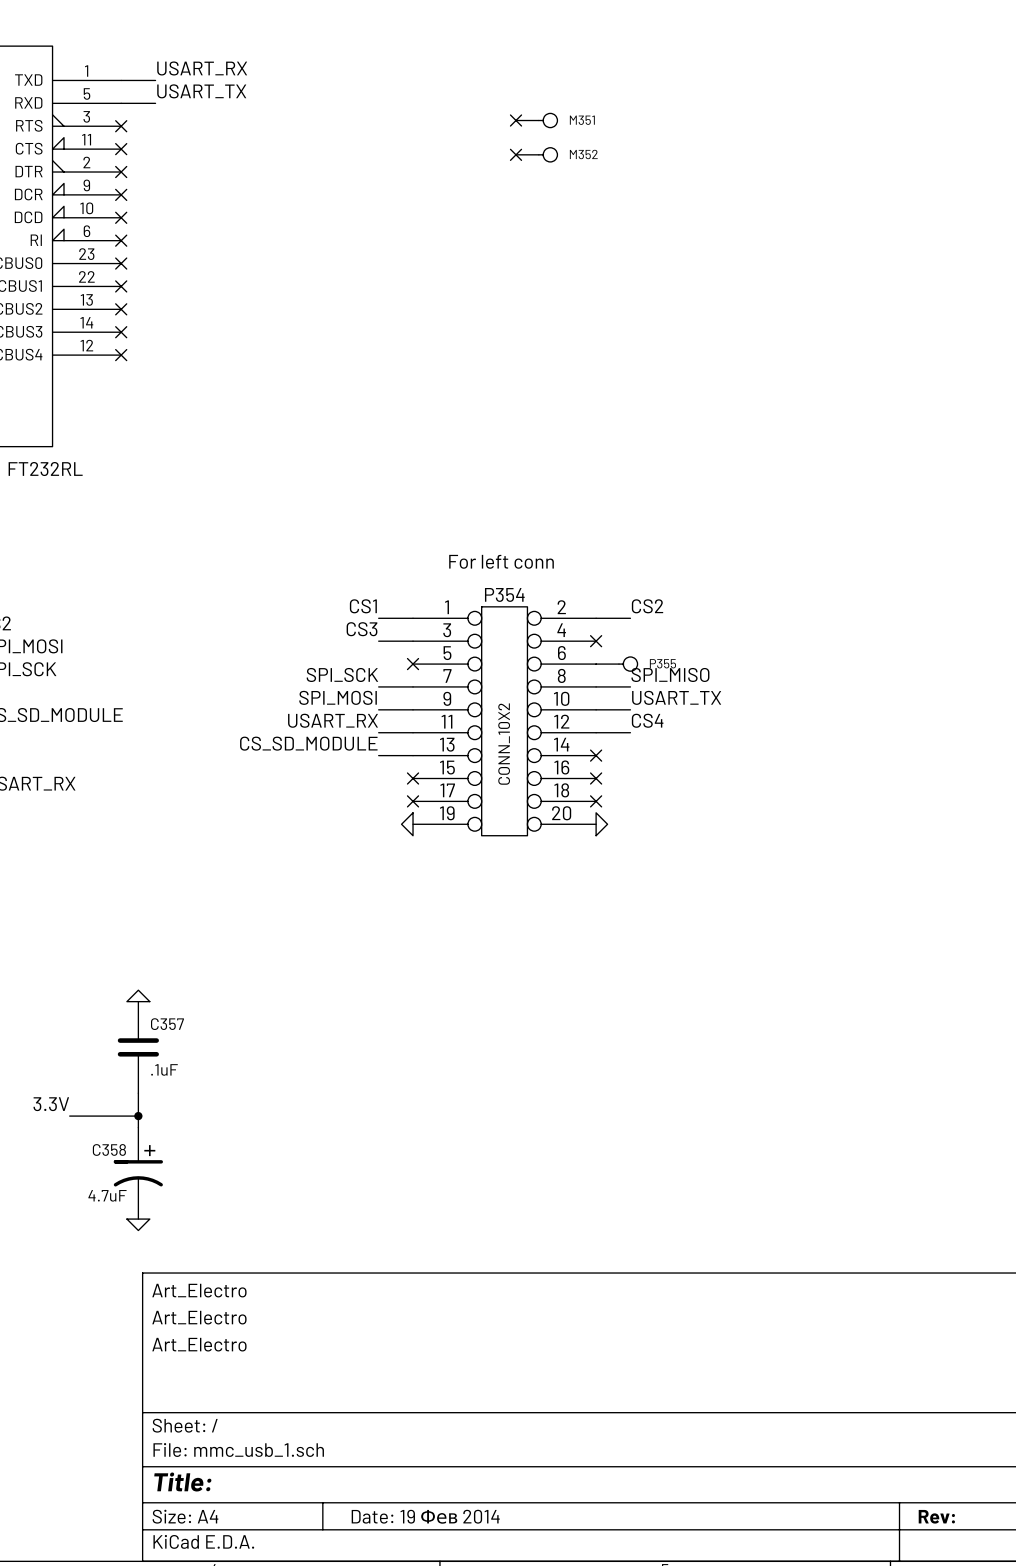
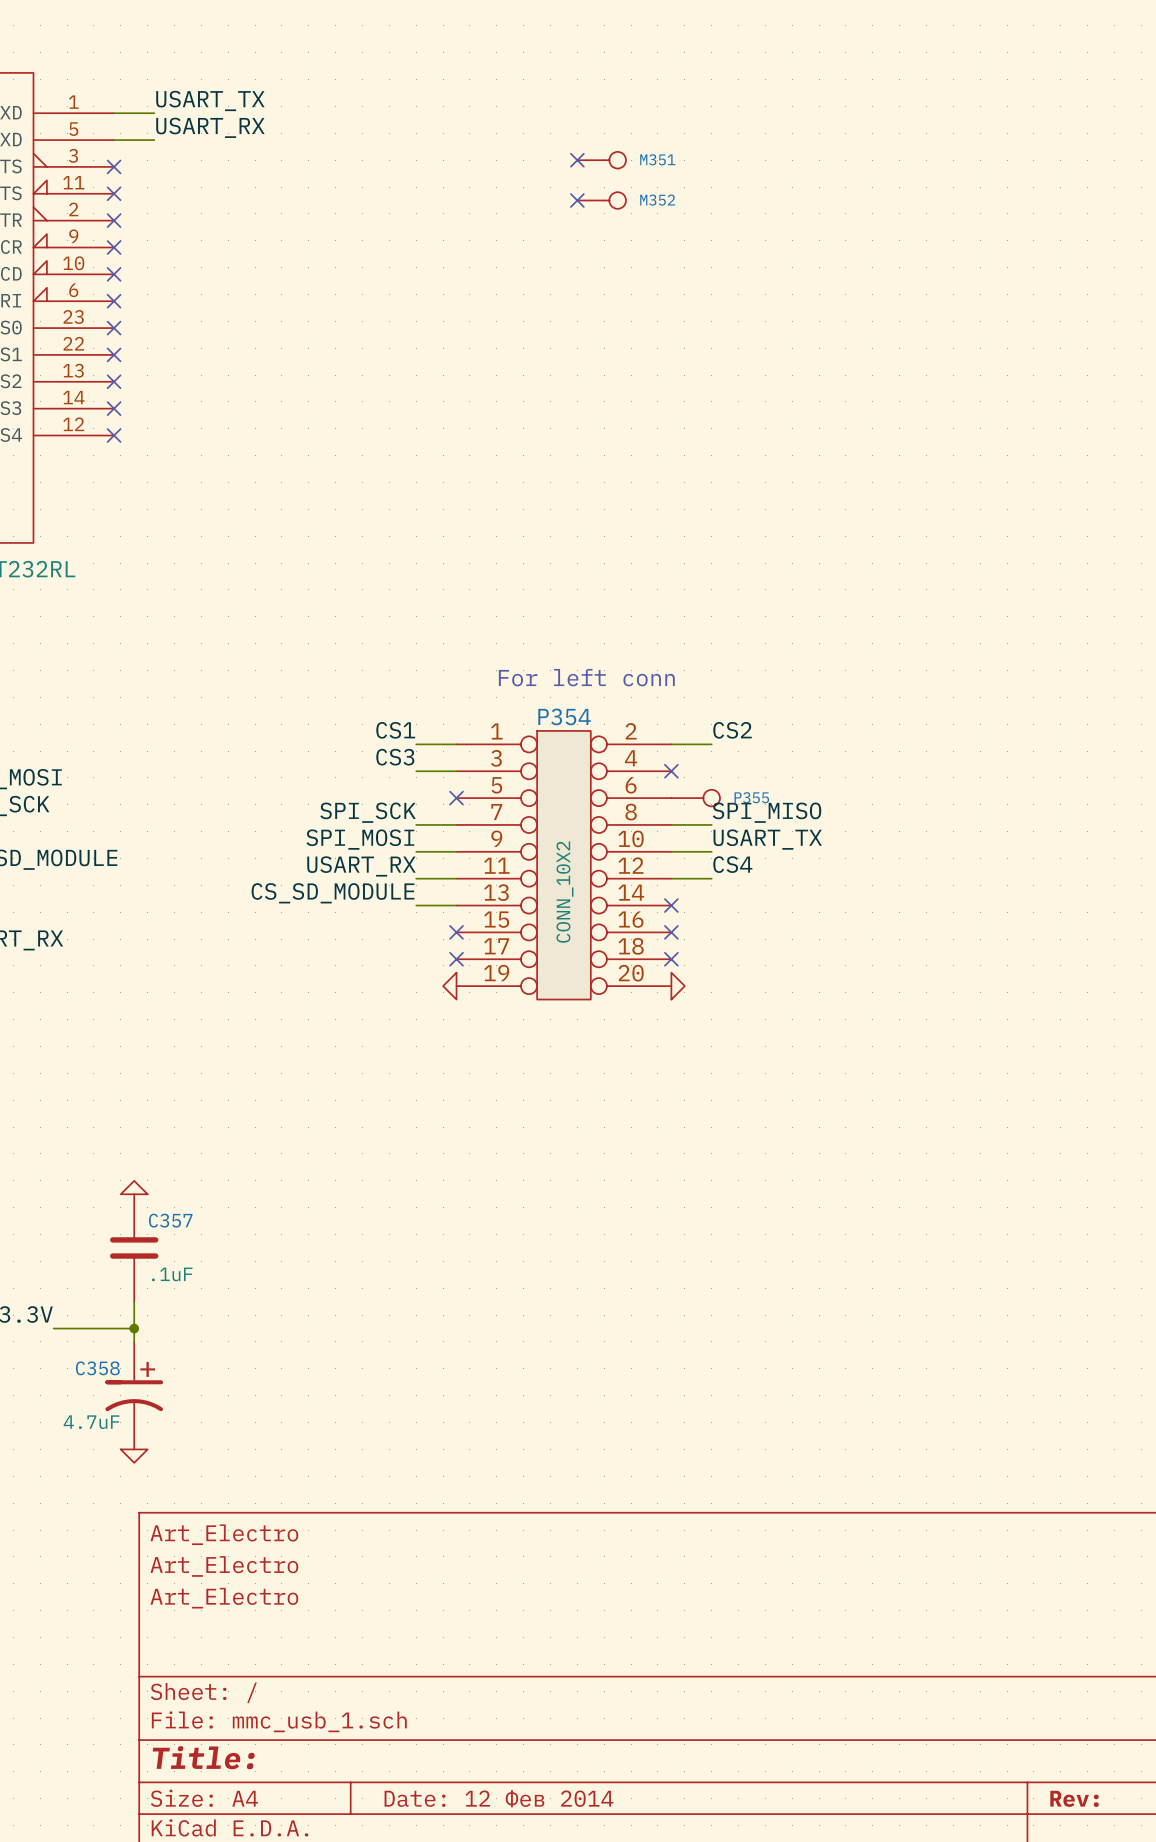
label: USART_RX (202, 68) -> USART_TX (210, 100)
label: USART_TX (201, 91) -> USART_RX (210, 127)
title block: Date: 19 Фев 2014 (425, 1516) -> Date: 12 Фев 2014 (498, 1798)

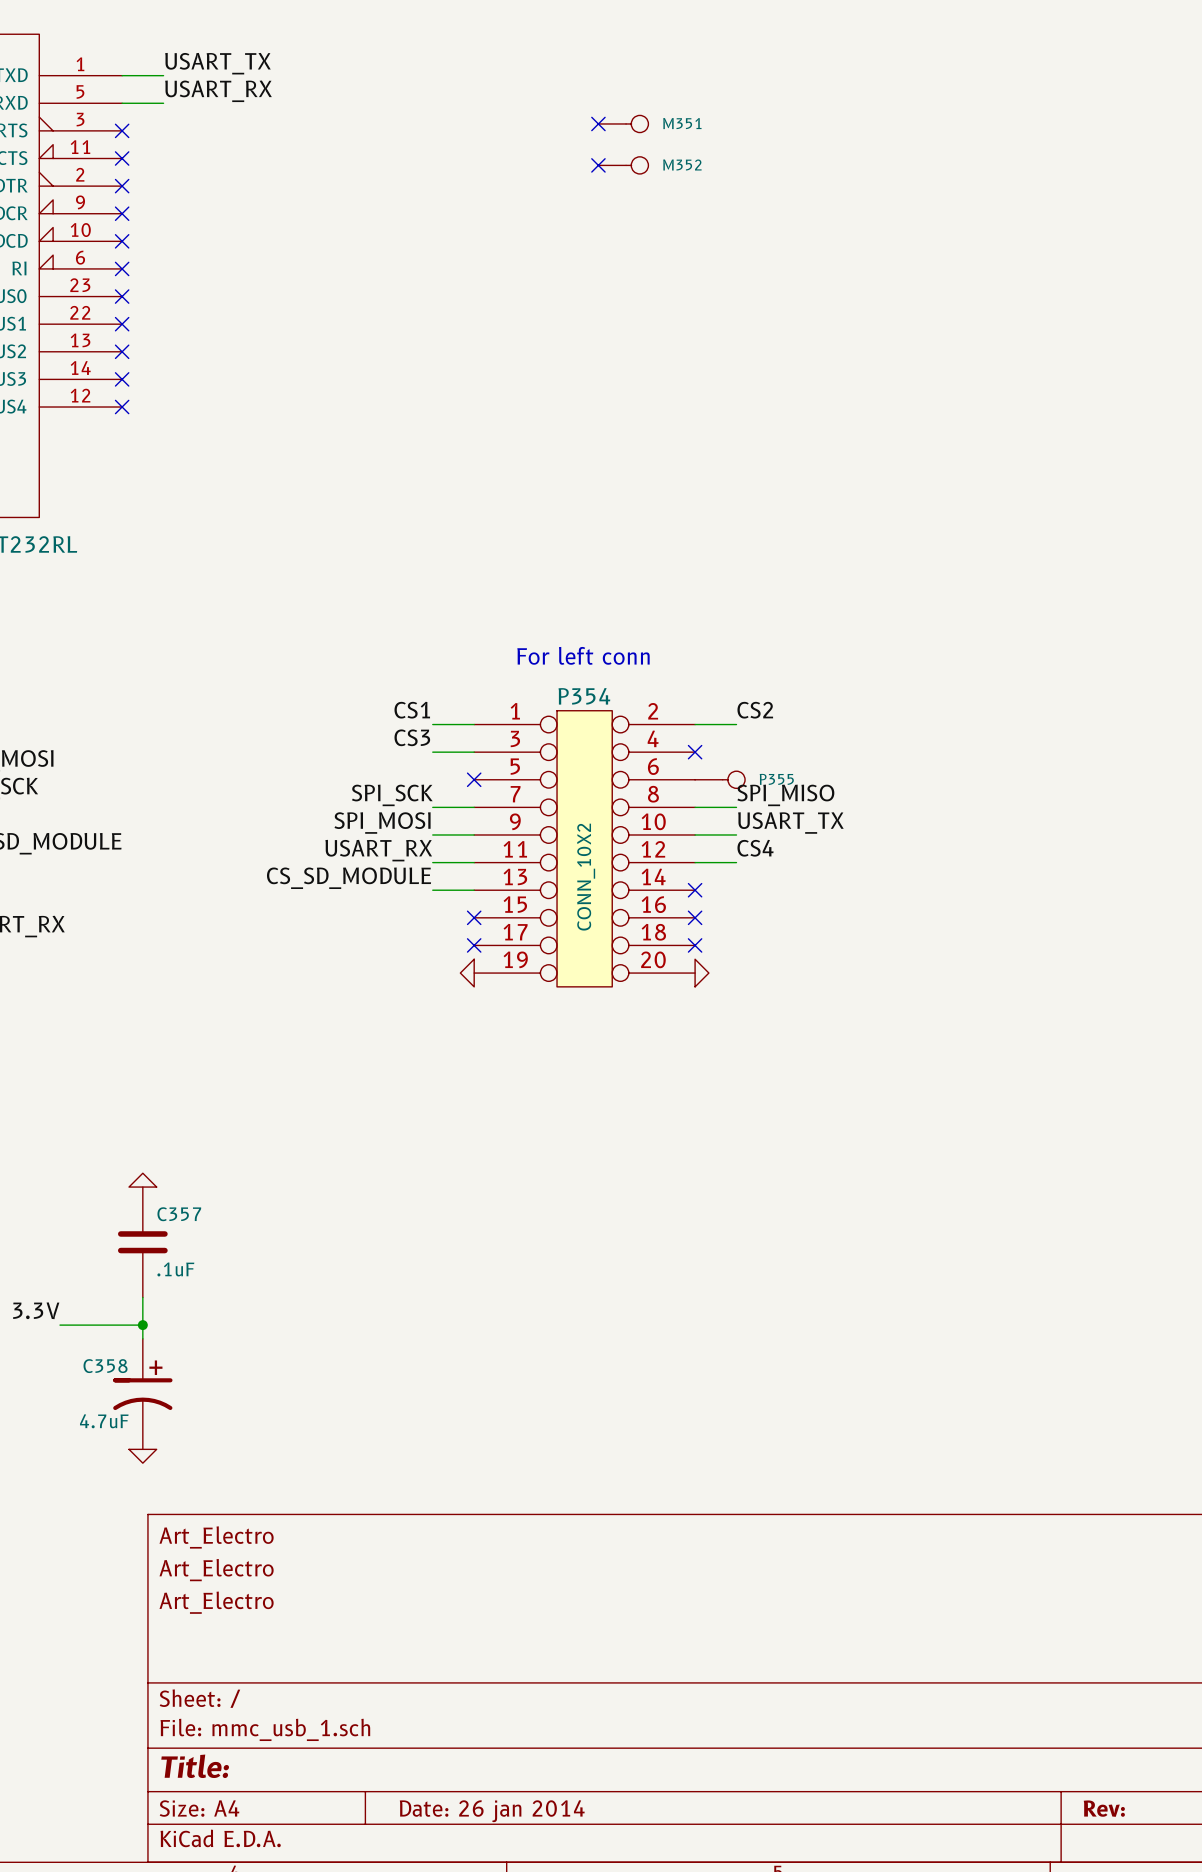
title block: Date: 12 Фев 2014 (498, 1798) -> Date: 26 jan 2014 (492, 1811)

